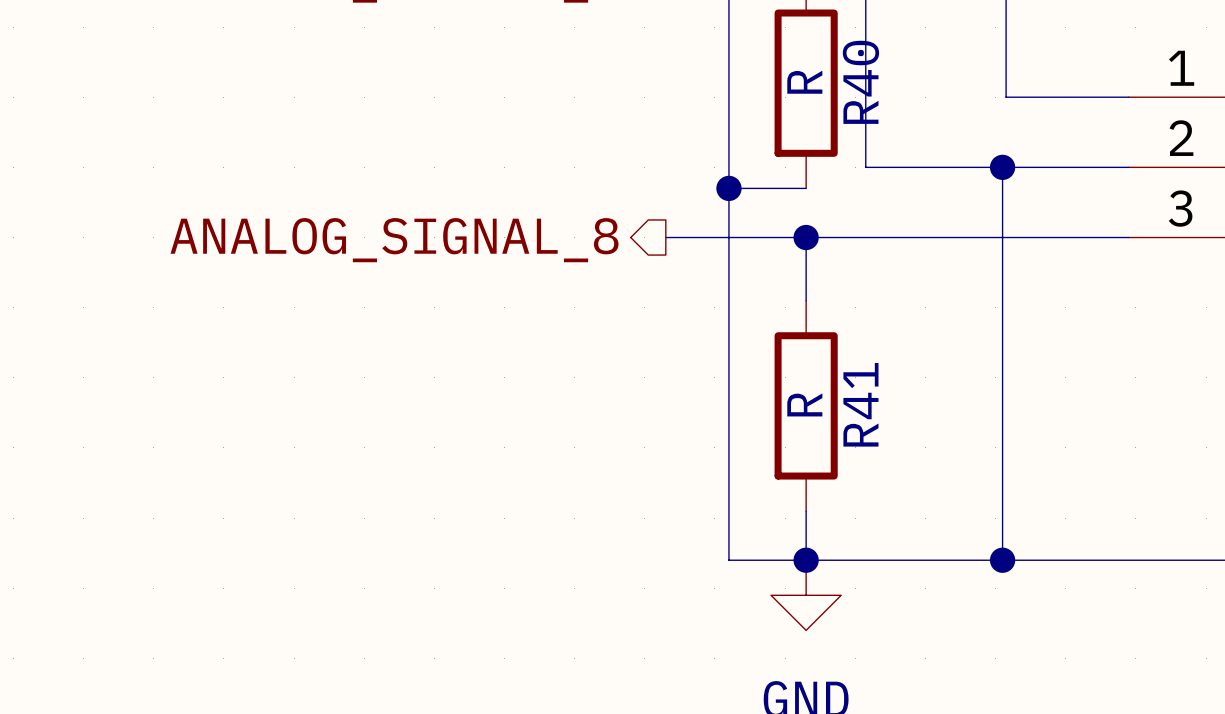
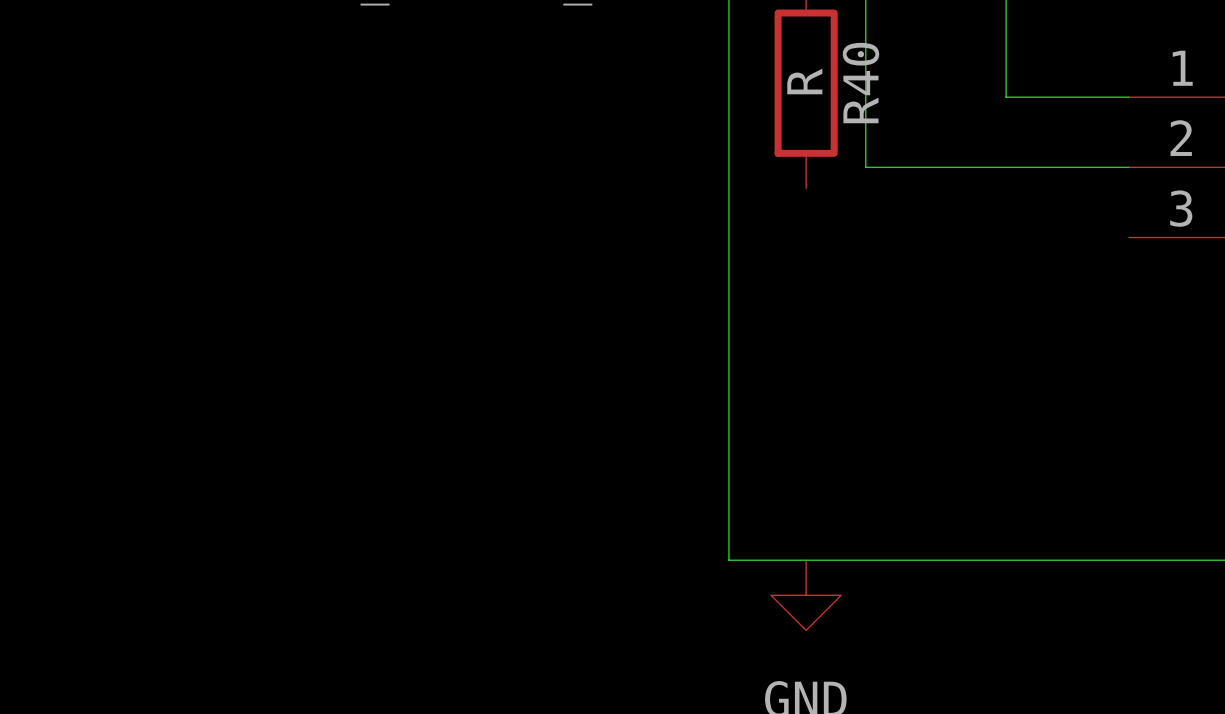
wire: (1002, 167) (1002, 560) -> none
junction: (1002, 167) -> none
wire: (728, 188) (806, 188) -> none
junction: (728, 188) -> none
wire: (665, 237) (1128, 237) -> none
wire: (806, 237) (806, 300) -> none
junction: (806, 237) -> none
hierarchical label: ANALOG_SIGNAL_8 (394, 240) -> none
R41: R (806, 405) -> none
wire: (806, 511) (806, 560) -> none
junction: (806, 560) -> none
junction: (1002, 560) -> none

